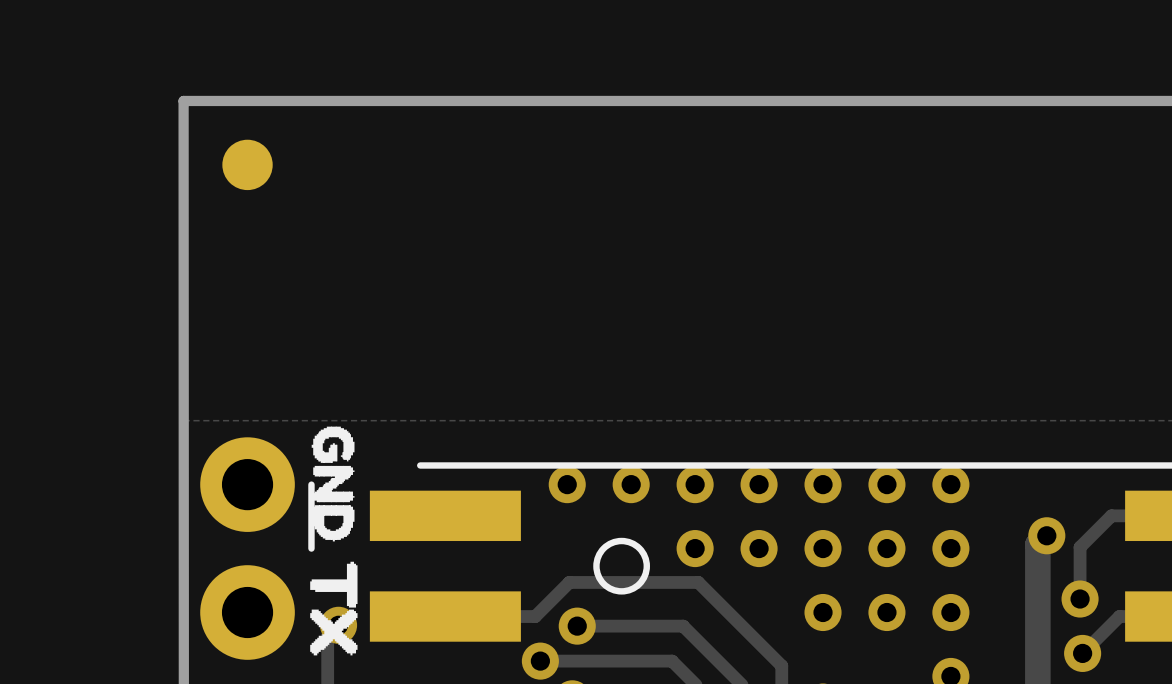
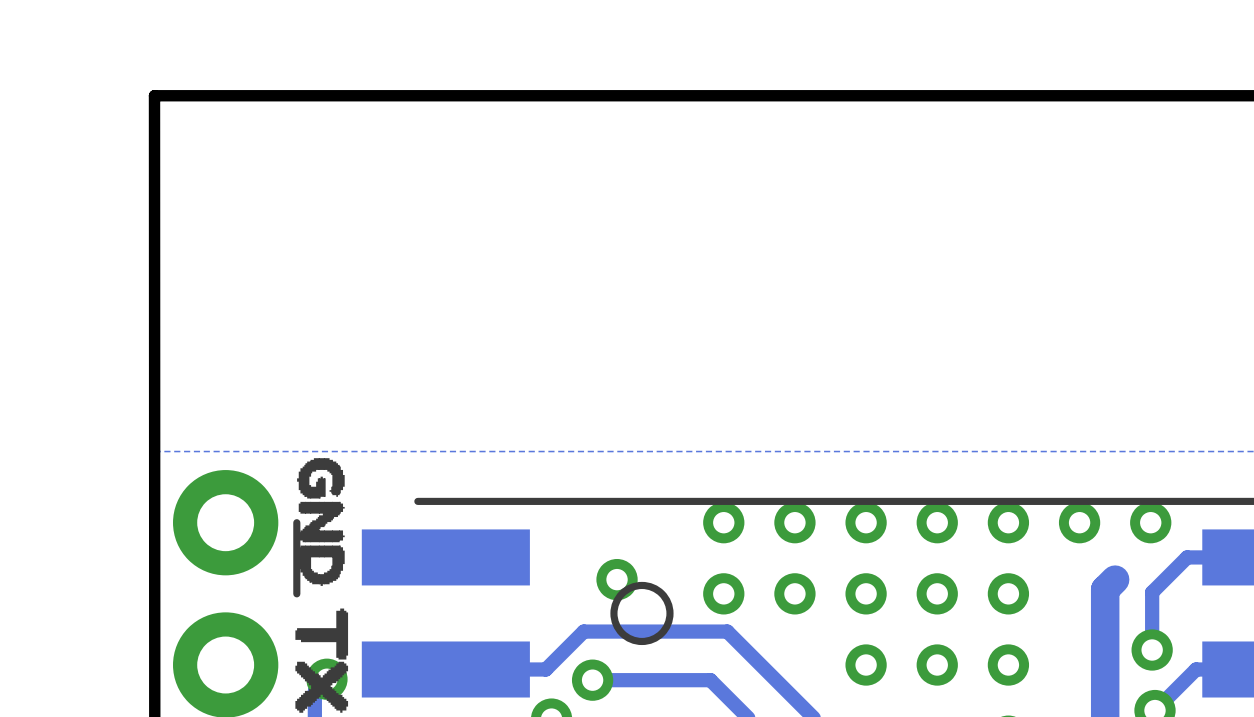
part: (247, 164) -> none
via: (567, 484) -> none
via: (631, 484) -> none
via: none -> (1079, 522)
via: none -> (1150, 522)
via: none -> (617, 579)
via: (1046, 535) -> none

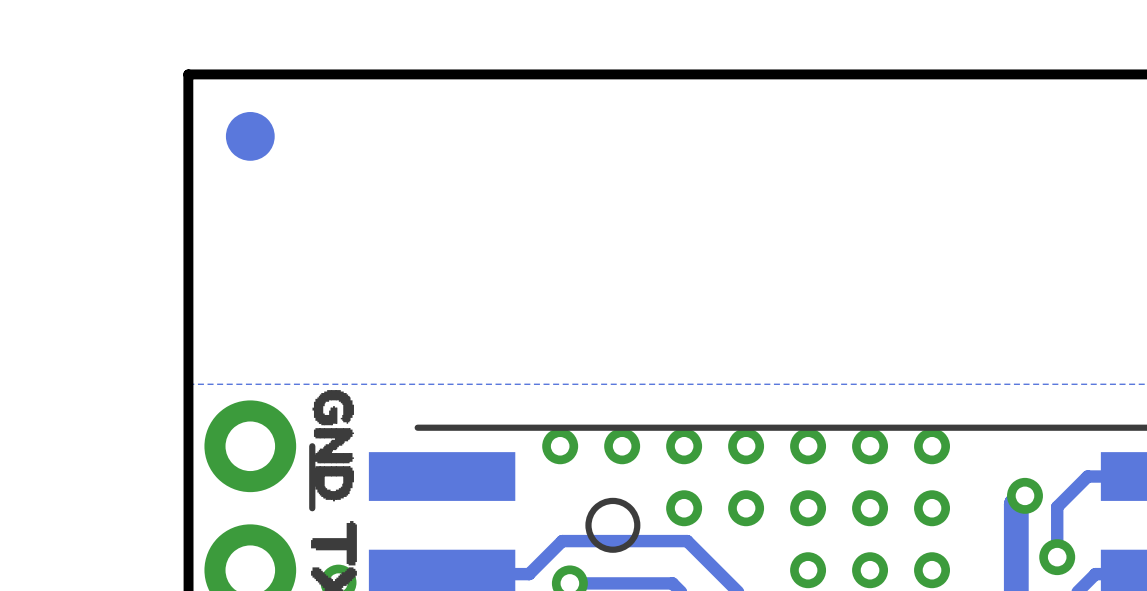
part: none -> (250, 136)
via: none -> (560, 446)
via: none -> (622, 446)
via: (1079, 522) -> none
via: (1150, 522) -> none
via: (617, 579) -> none
via: none -> (1024, 495)

